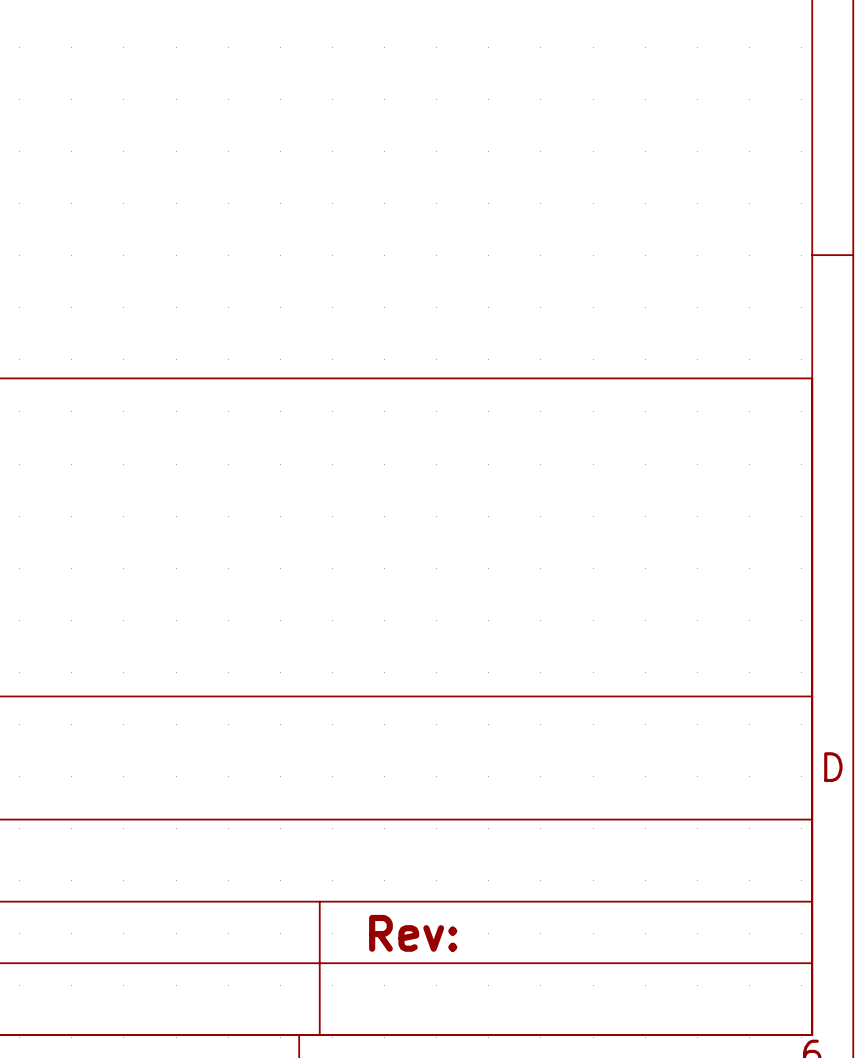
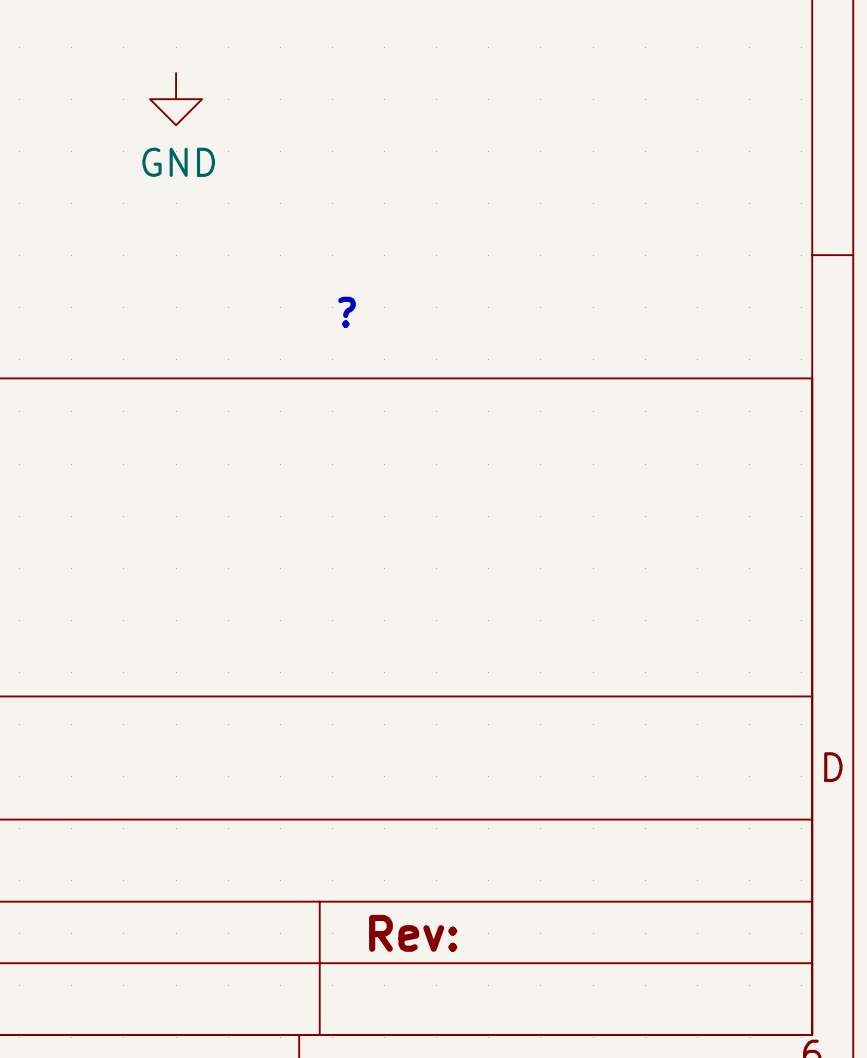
power symbol: none -> GND (176, 99)
text: none -> ? (347, 312)

